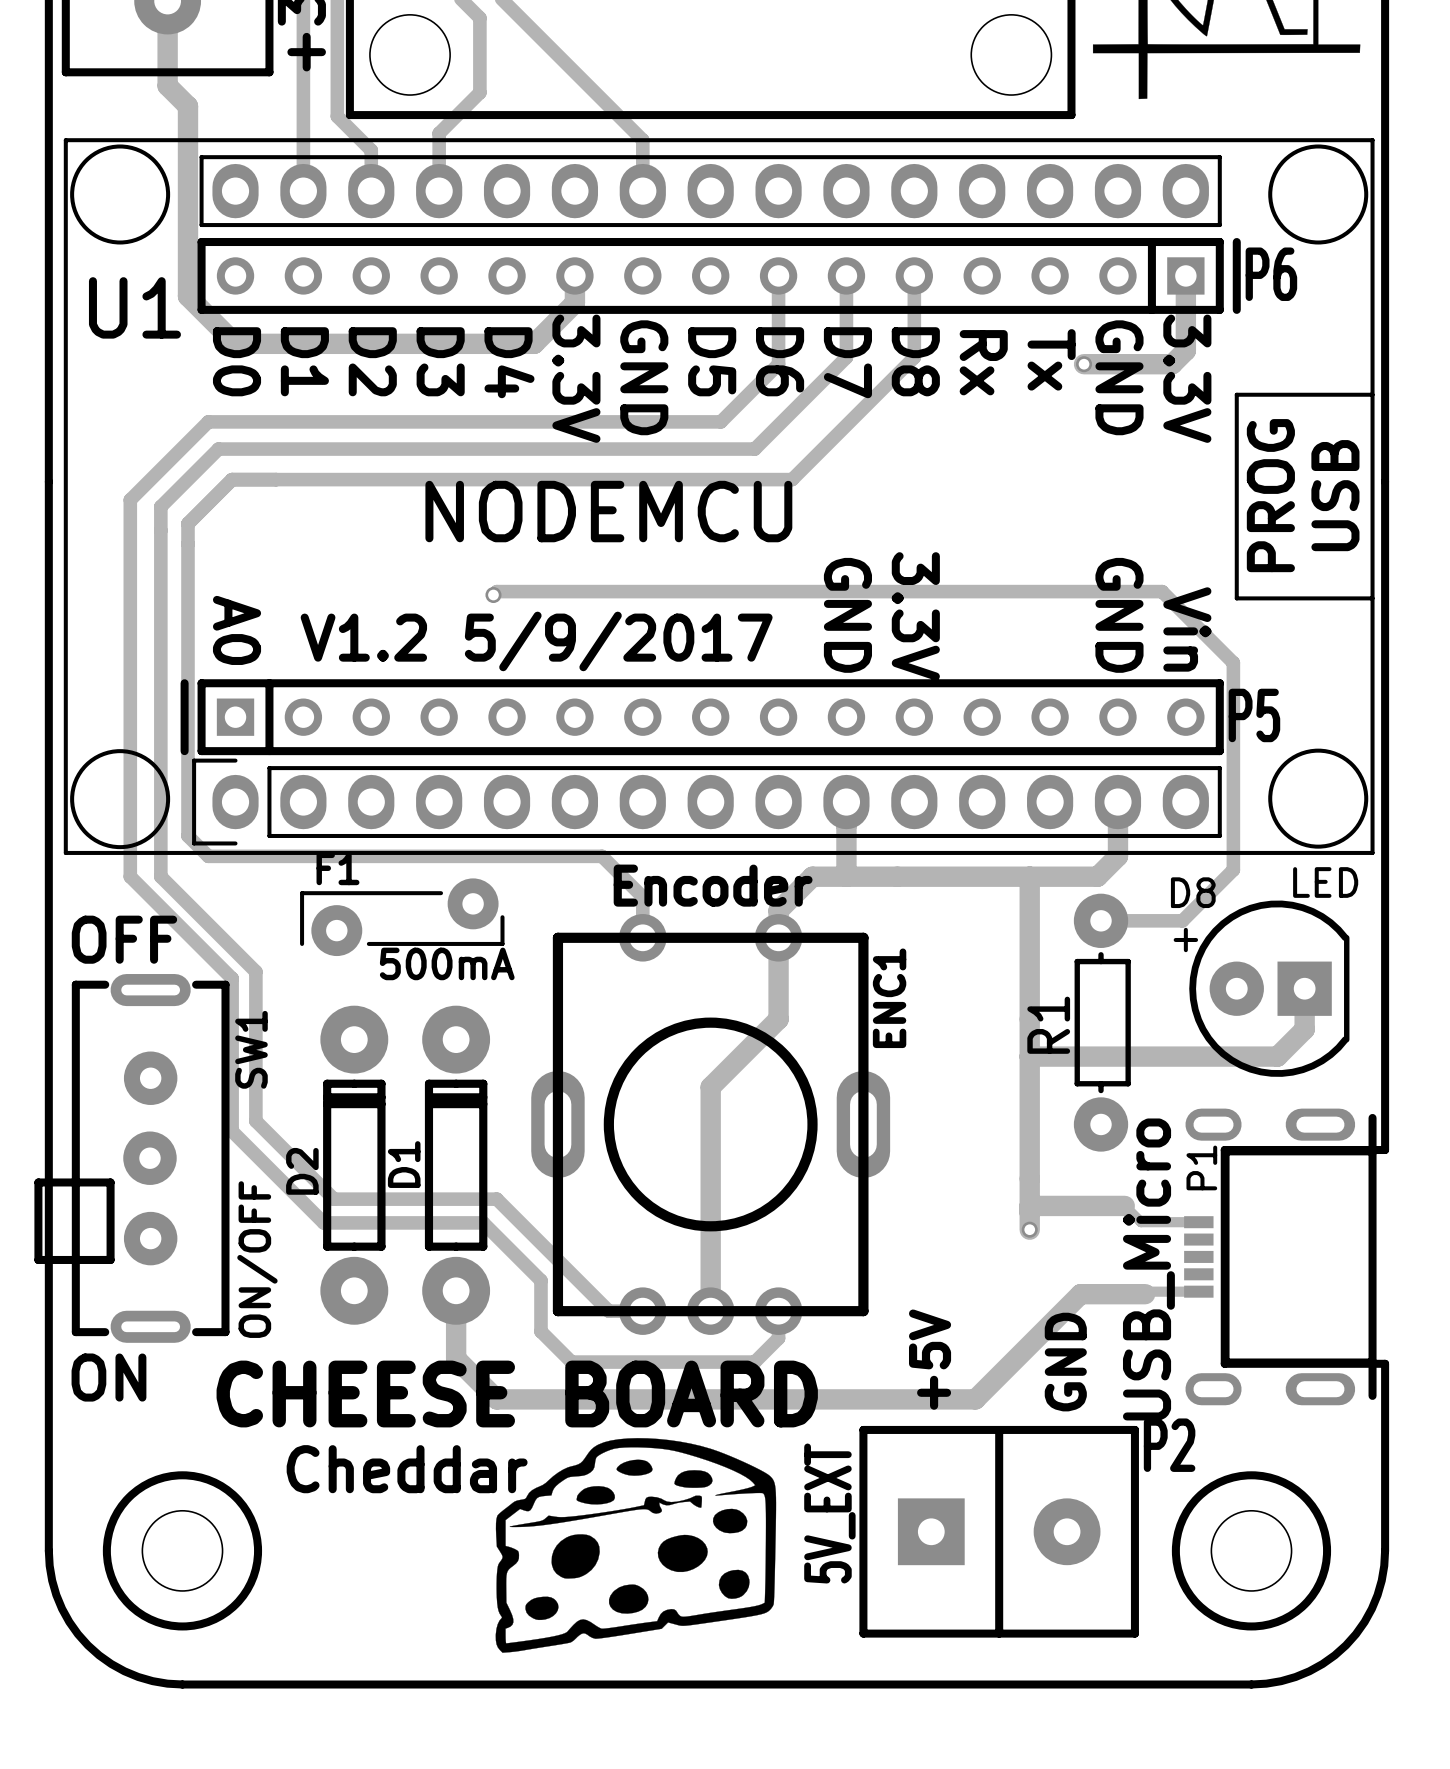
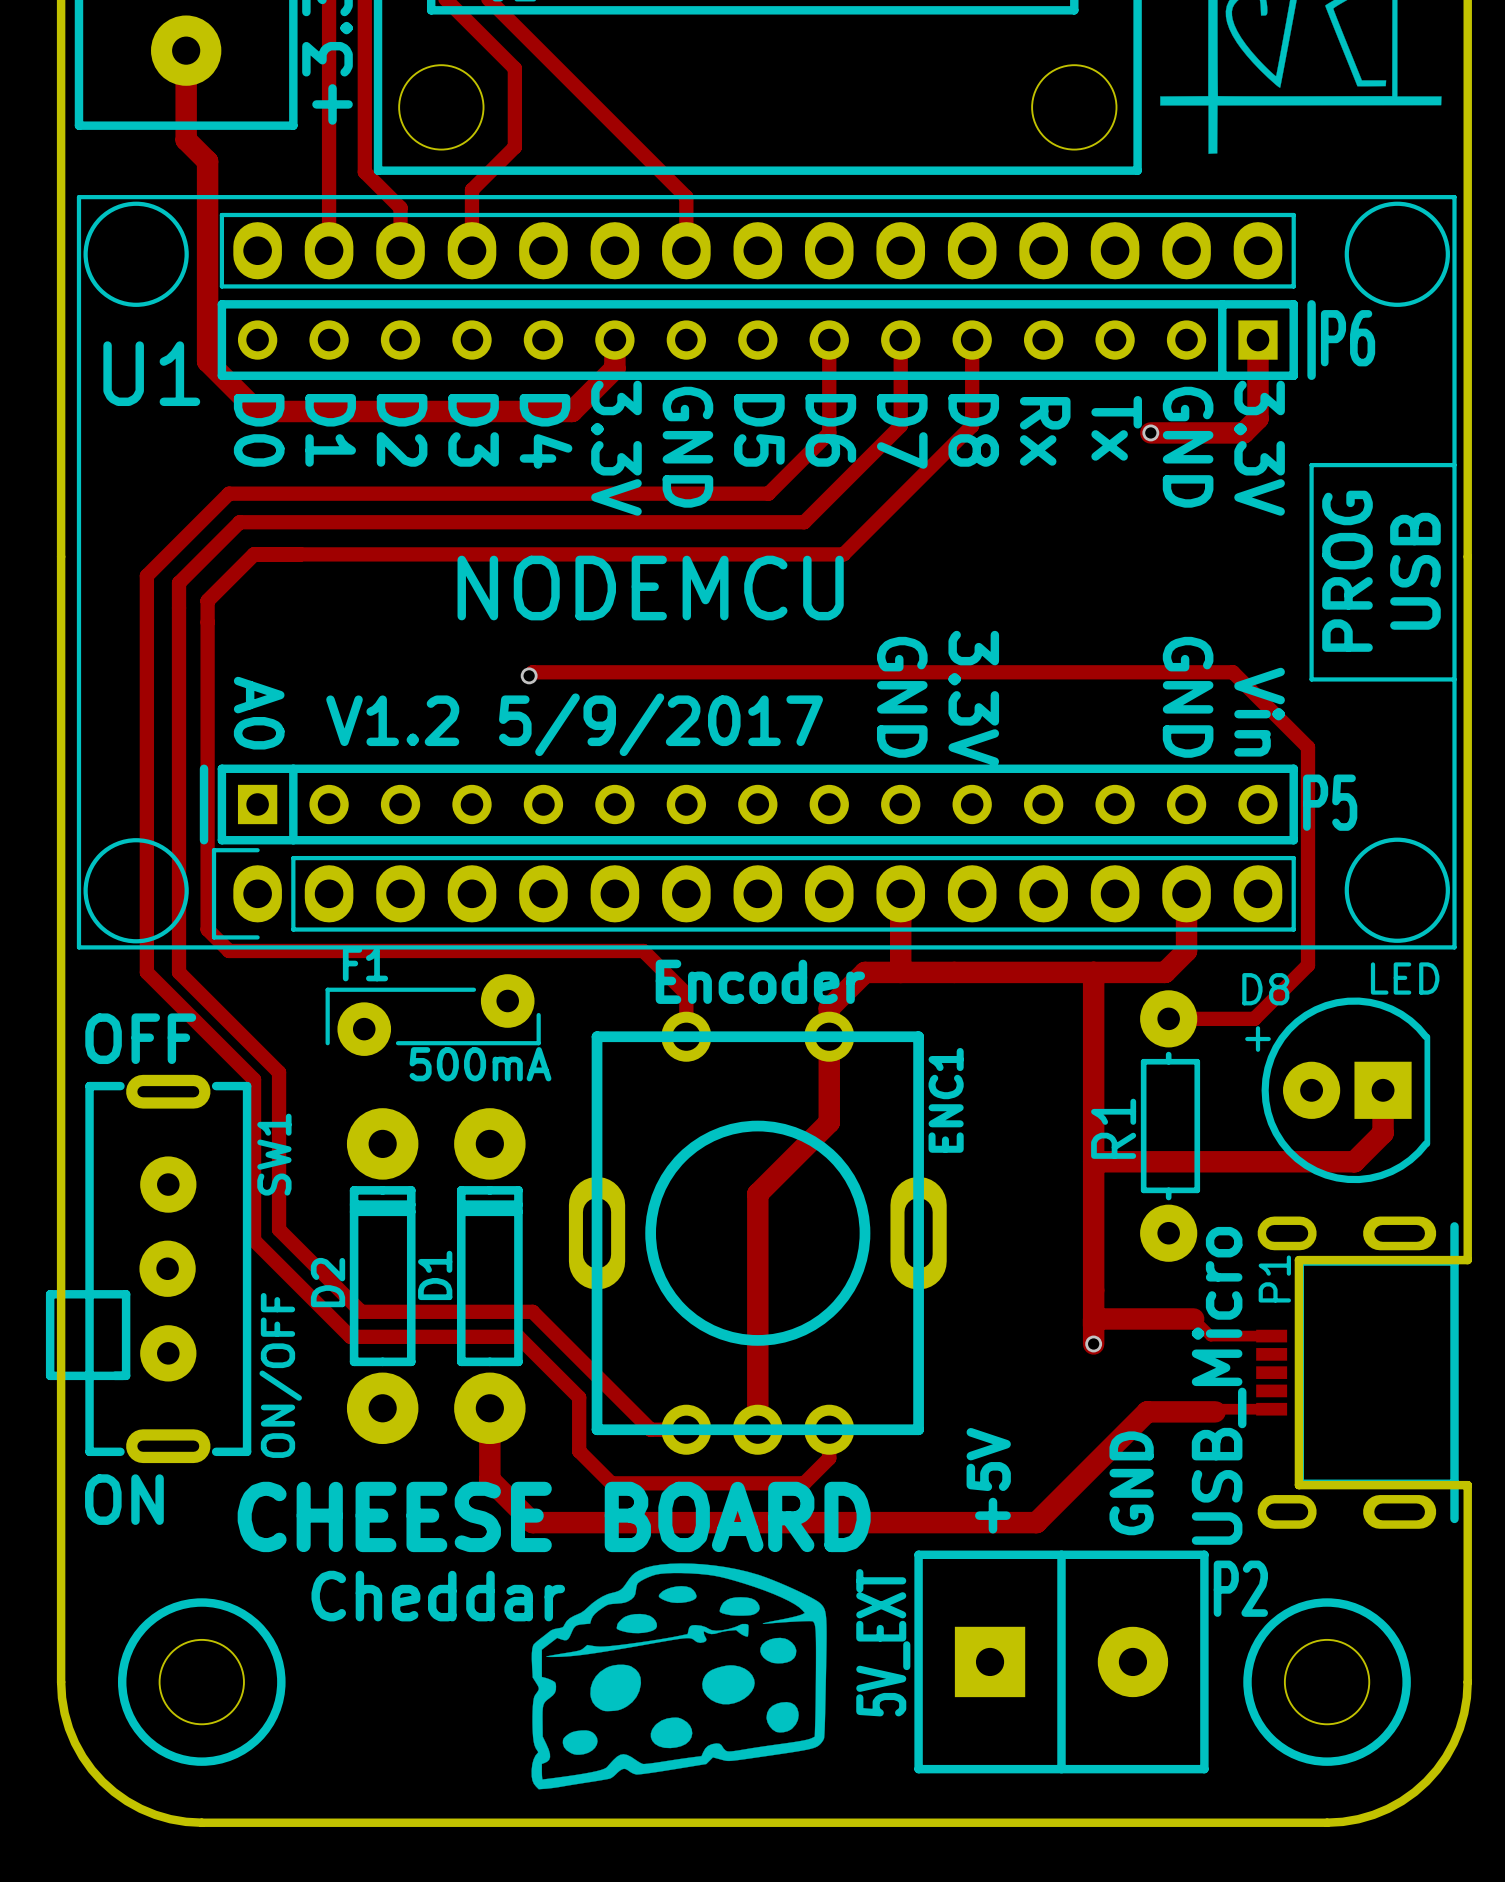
P2 name position: P2 (1169, 1445) -> P2 (1240, 1588)

